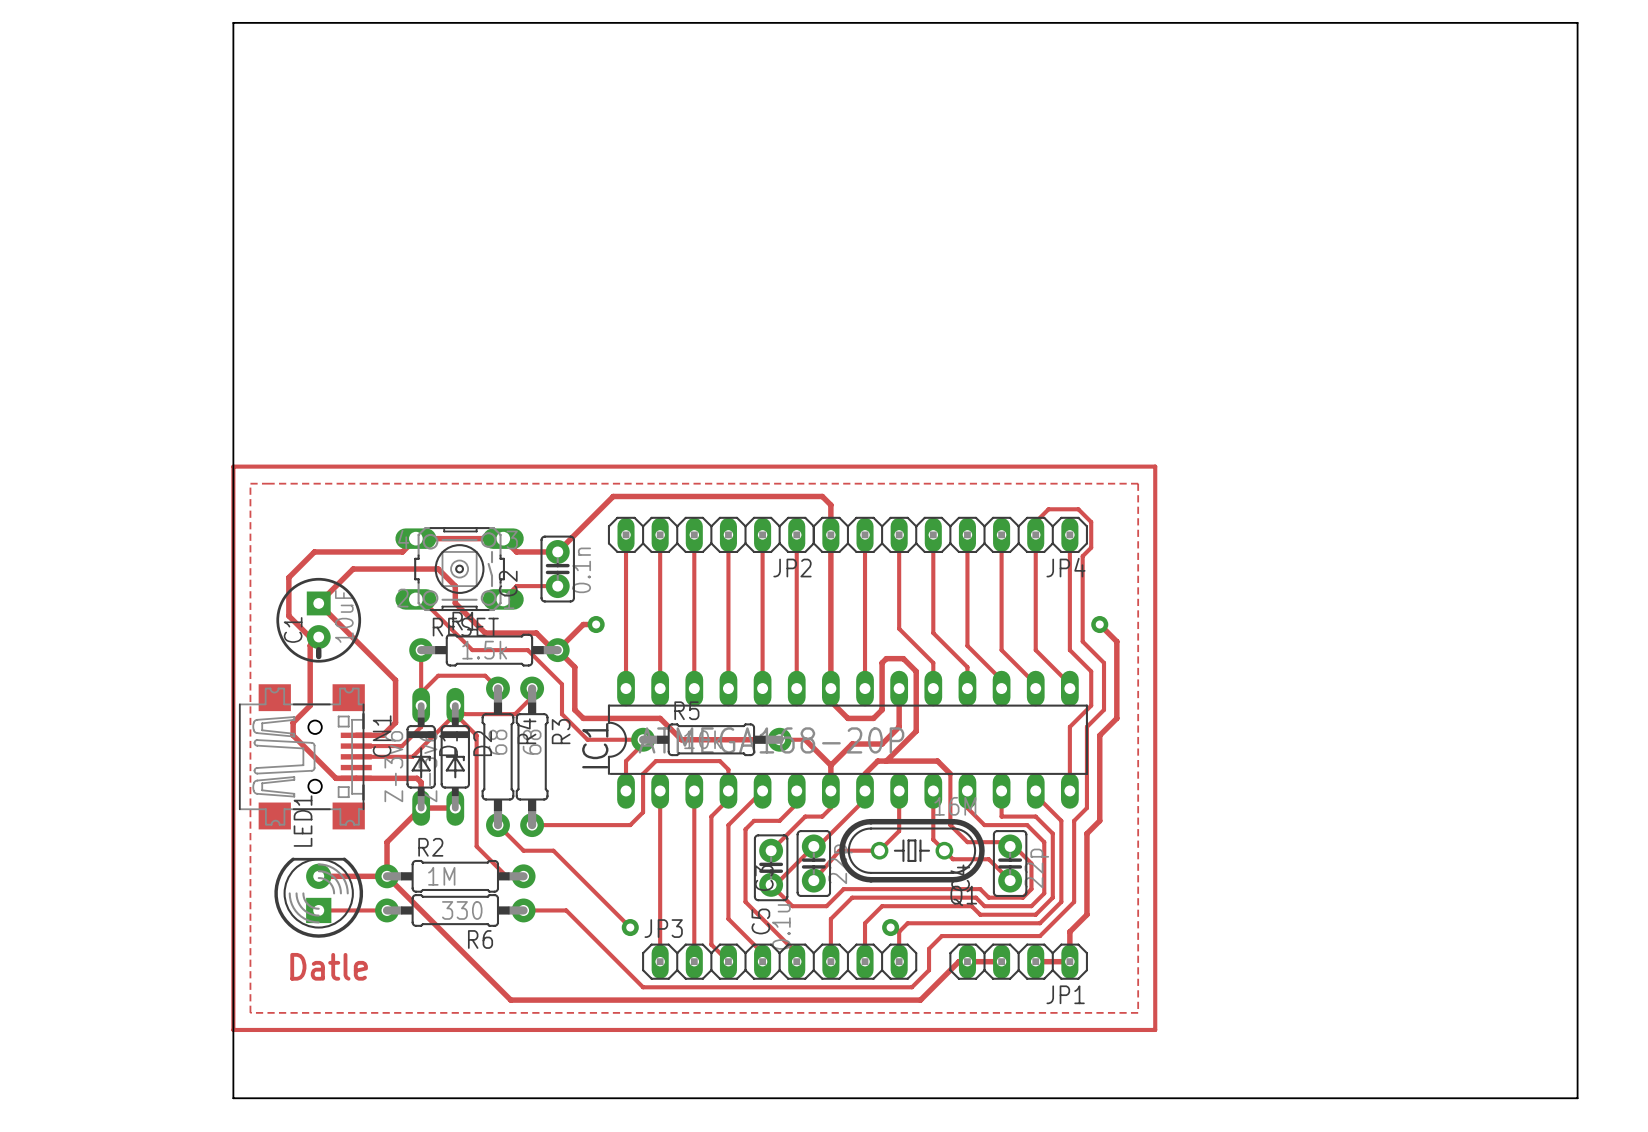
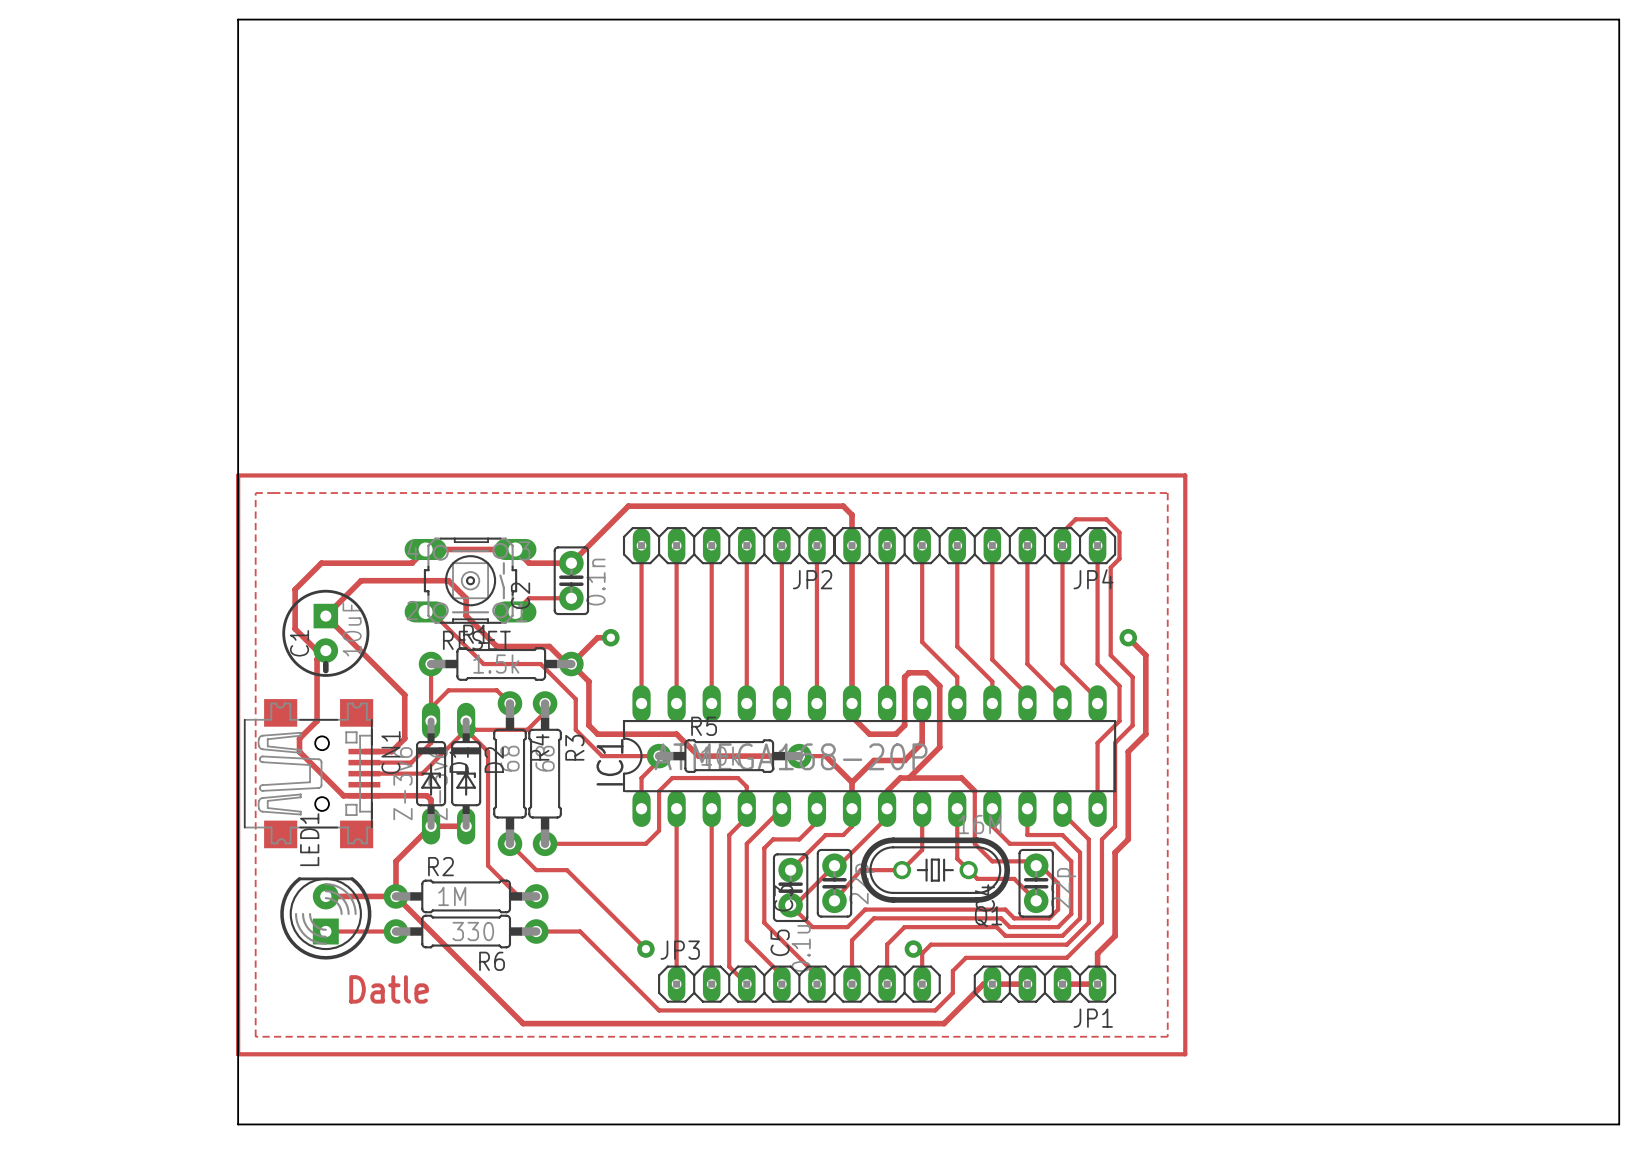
text position: Datle (329, 966) -> Datle (389, 989)

